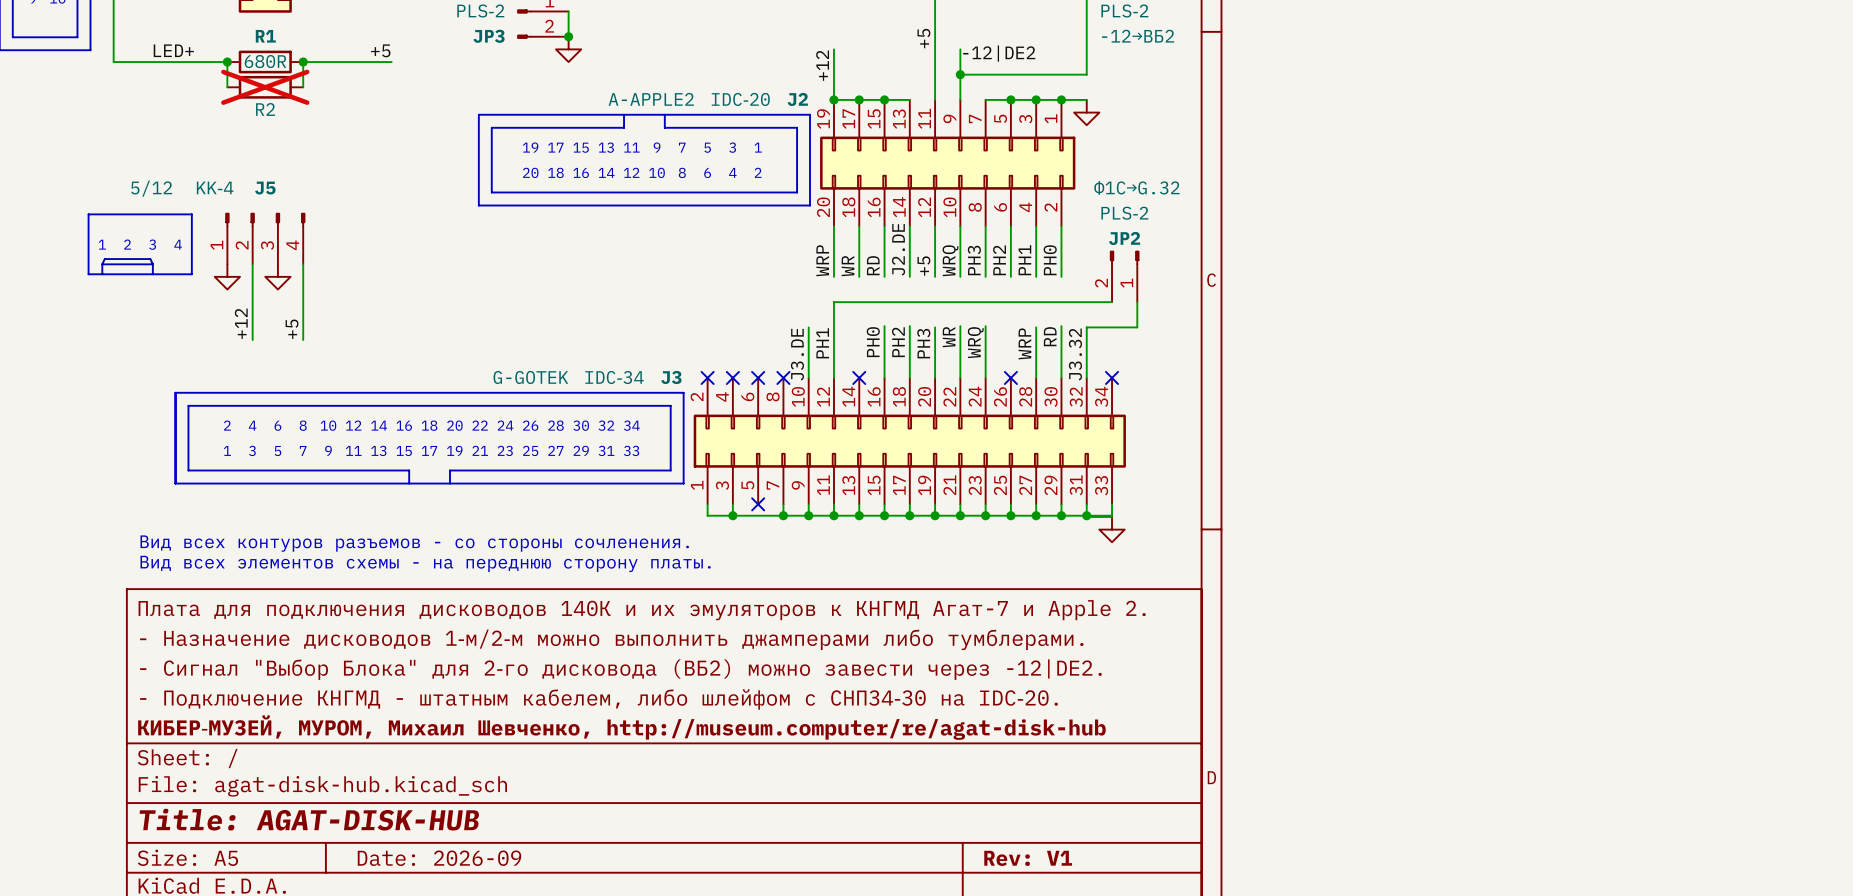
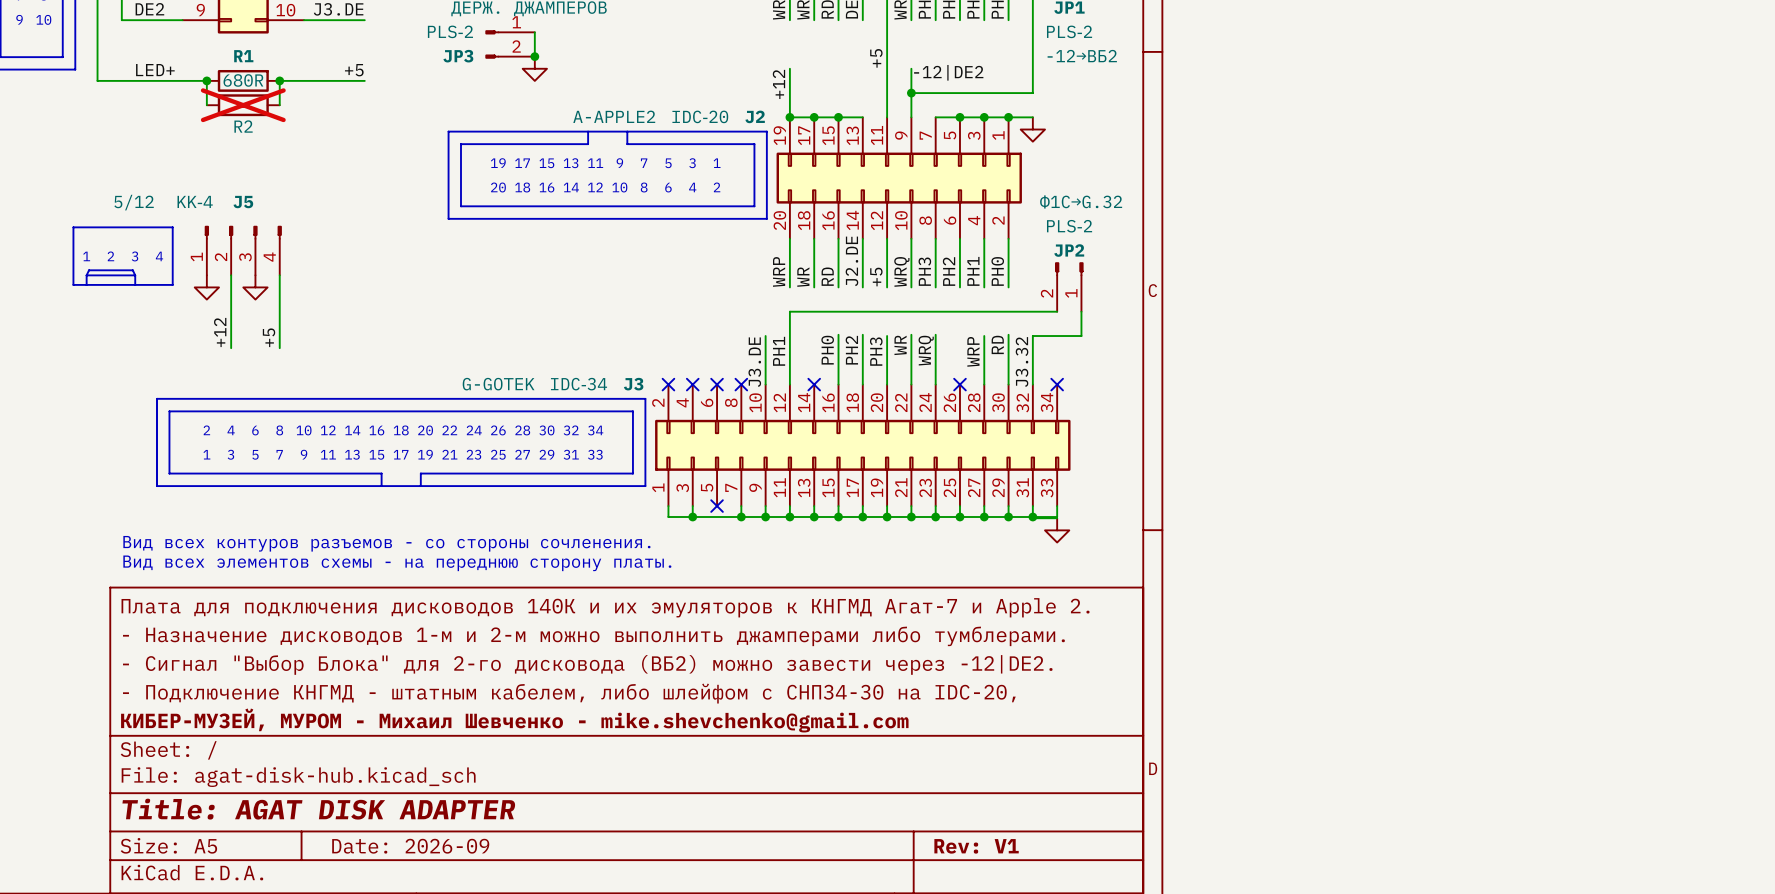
title block: - Назначение дисководов 1‐м/2‐м можно выполнить джамперами либо тумблерами. (611, 639) -> - Назначение дисководов 1-м и 2-м можно выполнить джамперами либо тумблерами. (593, 636)
title block: - Сигнал "Выбор Блока" для 2‐го дисковода (ВБ2) можно завести через -12|DE2. (620, 669) -> - Сигнал "Выбор Блока" для 2-го дисковода (ВБ2) можно завести через -12|DE2. (587, 664)
title block: - Подключение КНГМД - штатным кабелем, либо шлейфом с СНП34‐30 на IDC‐20. (598, 699) -> - Подключение КНГМД - штатным кабелем, либо шлейфом с СНП34-30 на IDC-20, (569, 693)
title block: КИБЕР‐МУЗЕЙ, МУРОМ, Михаил Шевченко, http://museum.computer/re/agat-disk-hub (621, 727) -> КИБЕР-МУЗЕЙ, МУРОМ - Михаил Шевченко - mike.shevchenko@gmail.com (514, 720)
title block: Title: AGAT-DISK-HUB (309, 819) -> Title: AGAT DISK ADAPTER (318, 809)

